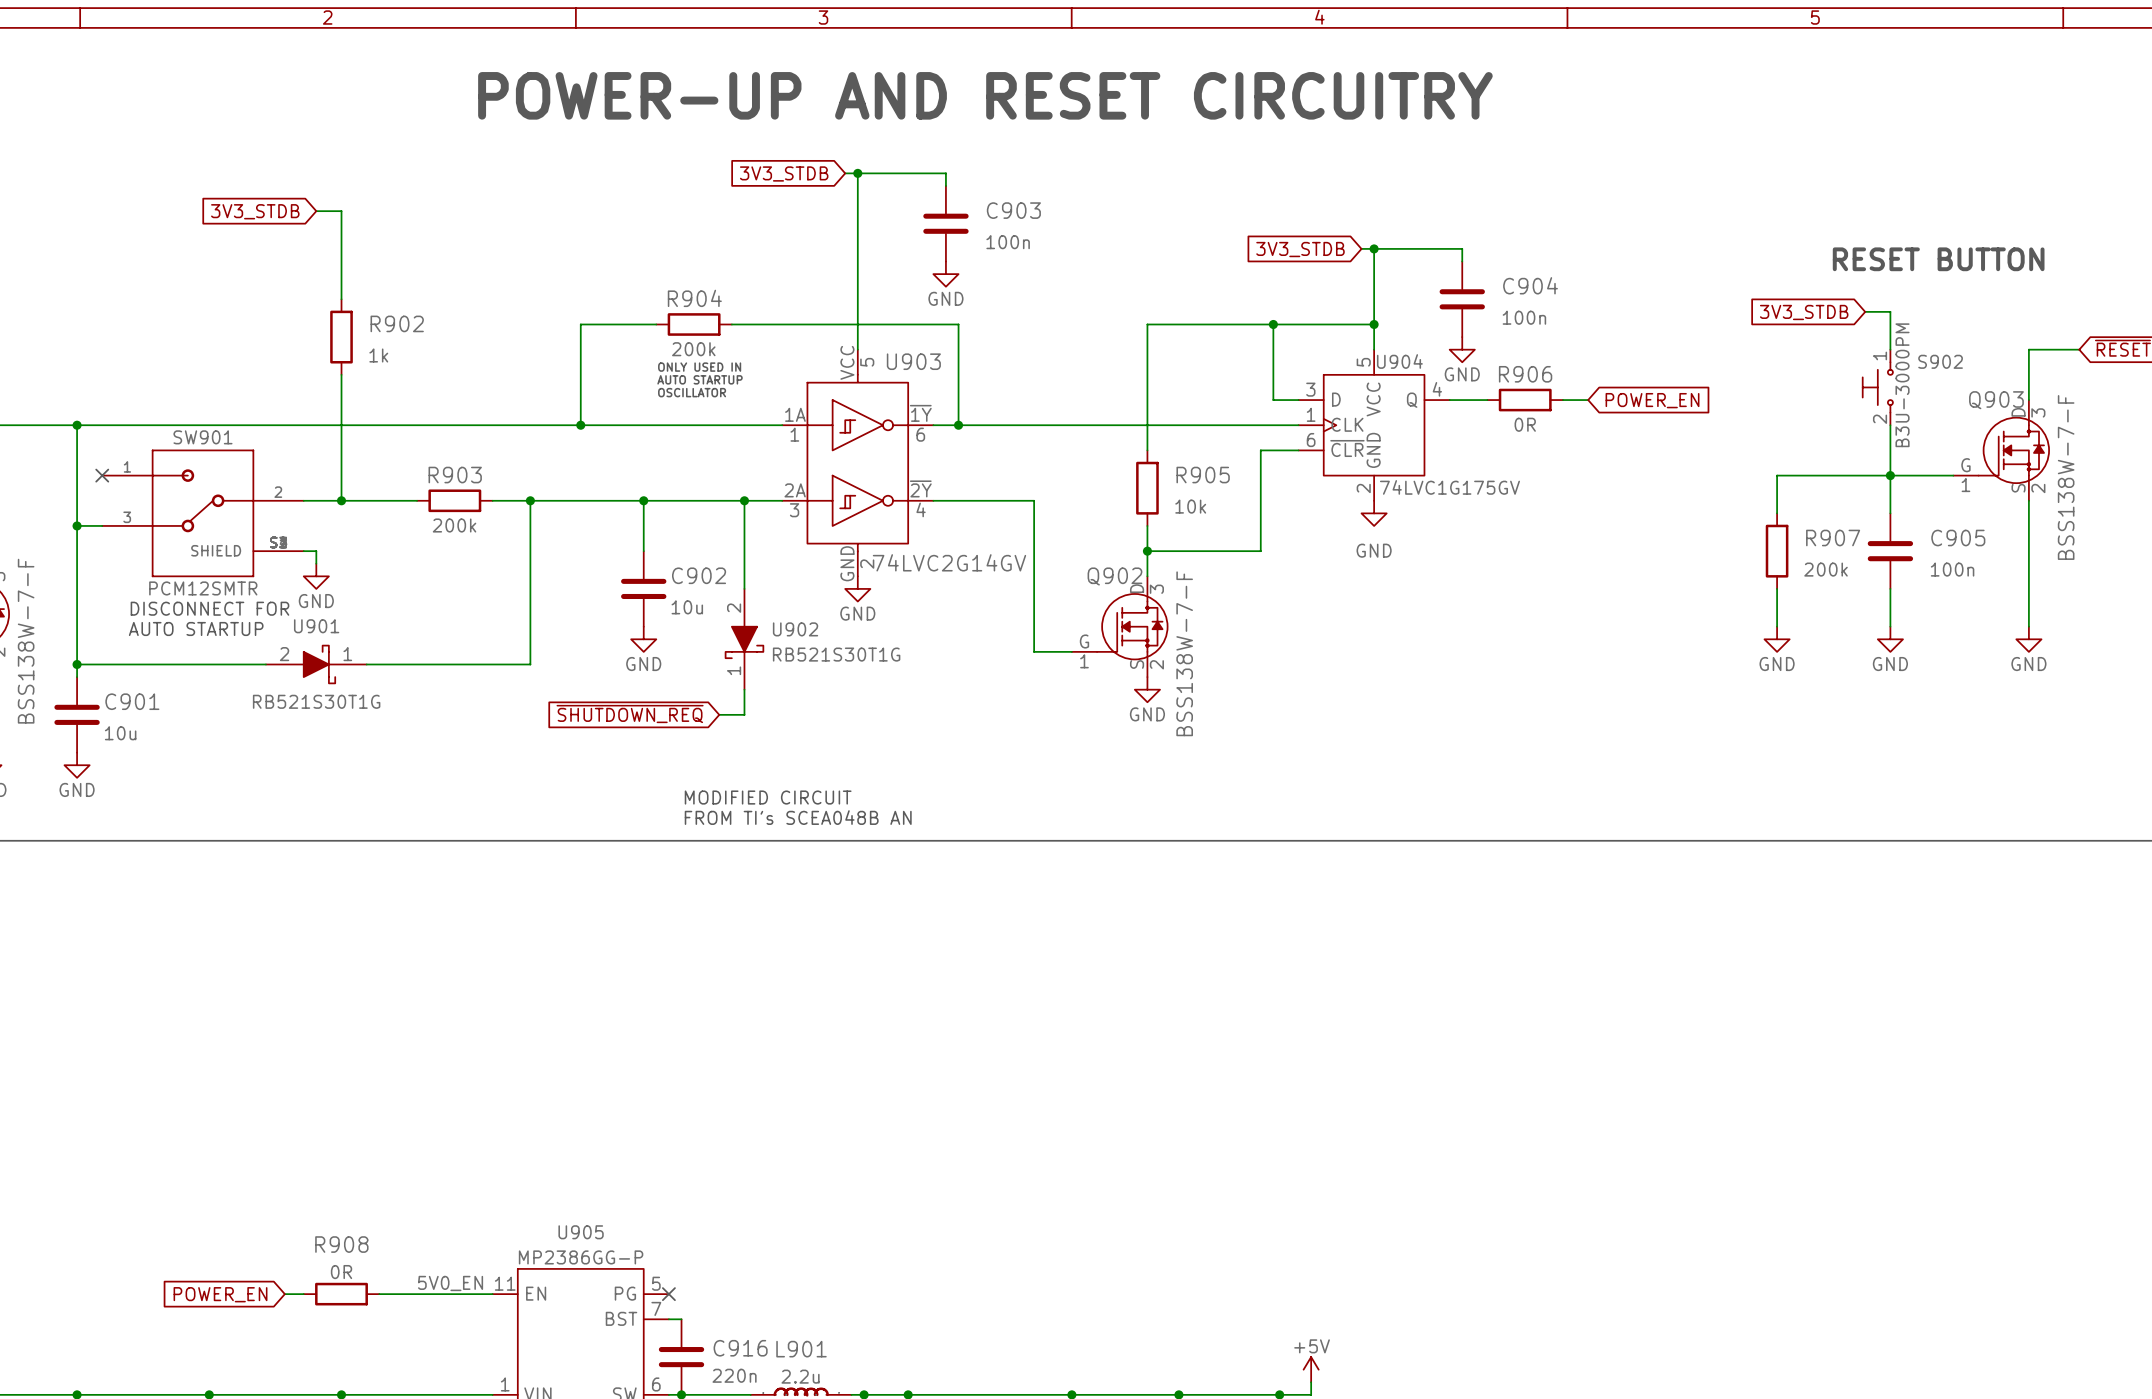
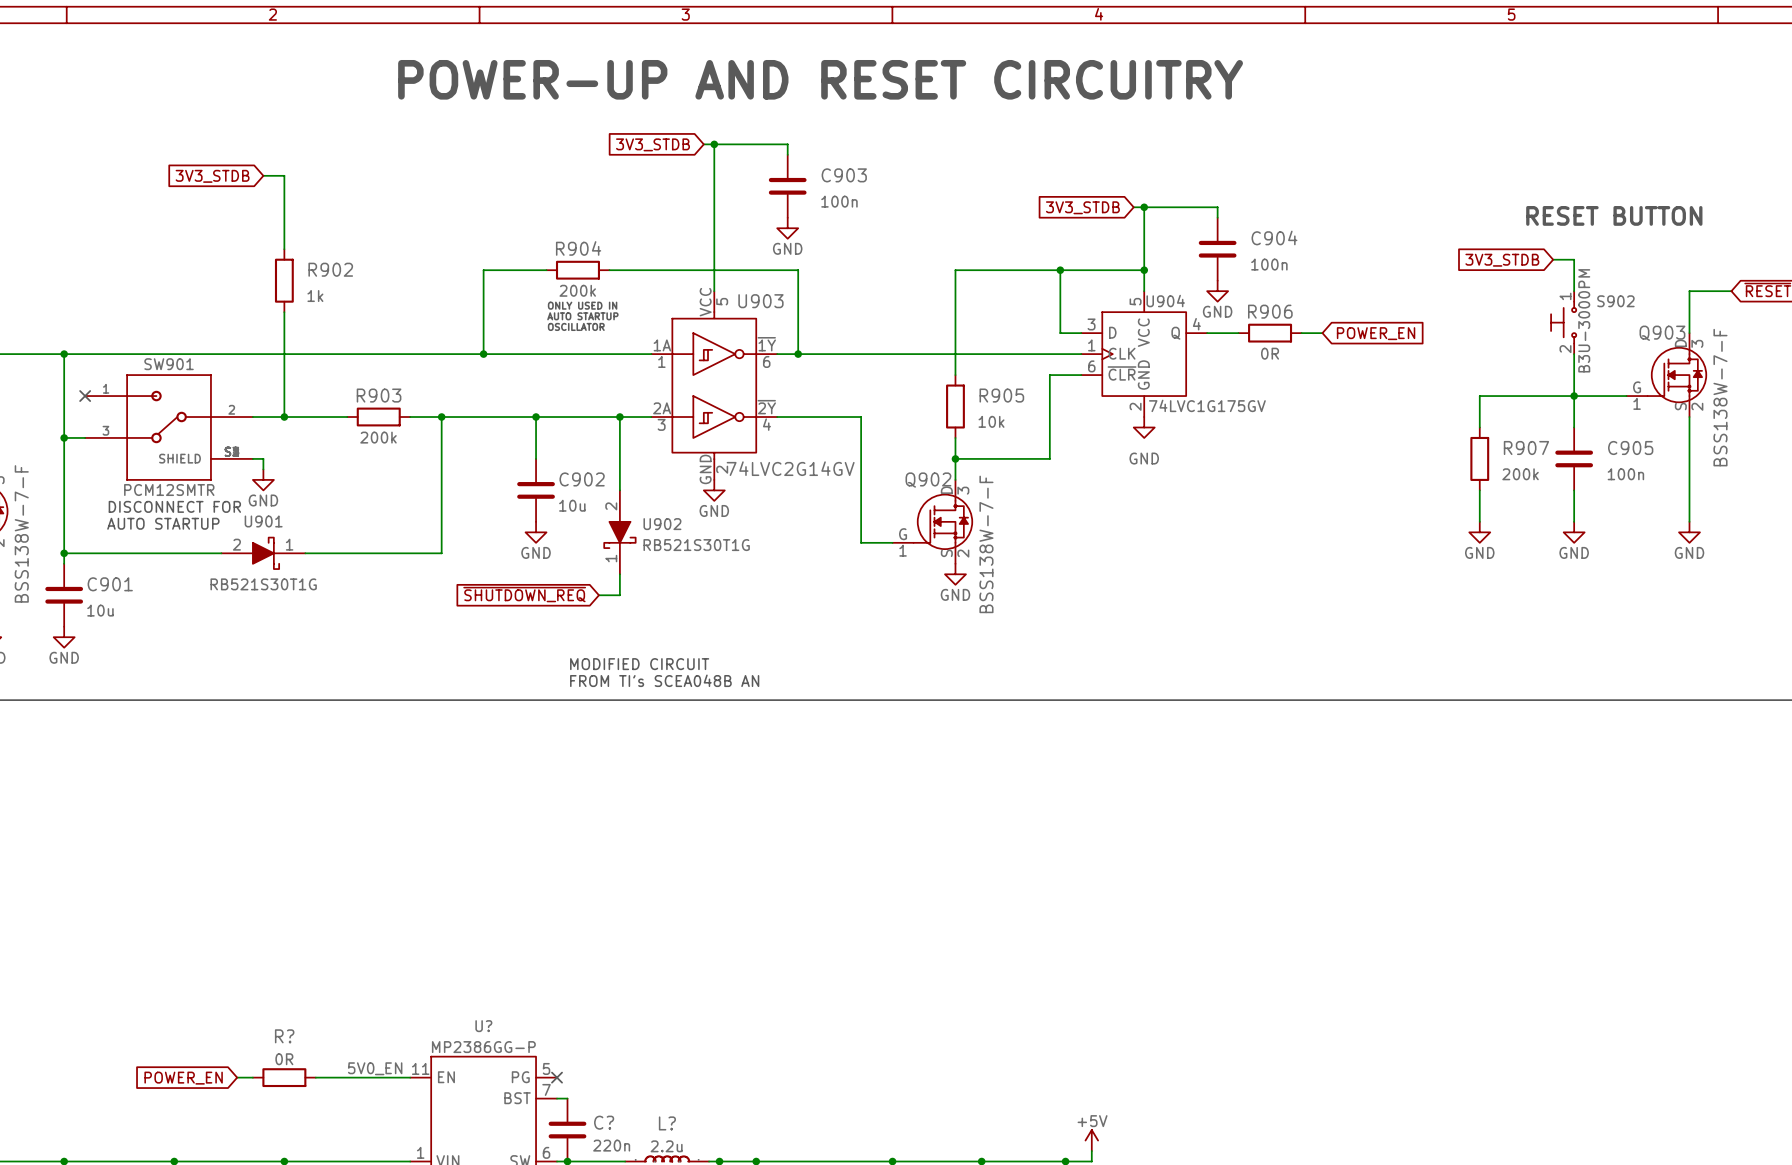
U905 name: U905 (581, 1232) -> U? (483, 1026)
R908 name: R908 (341, 1244) -> R? (284, 1036)
C916 name: C916 (740, 1348) -> C? (604, 1122)
L901 name: L901 (801, 1349) -> L? (667, 1123)

